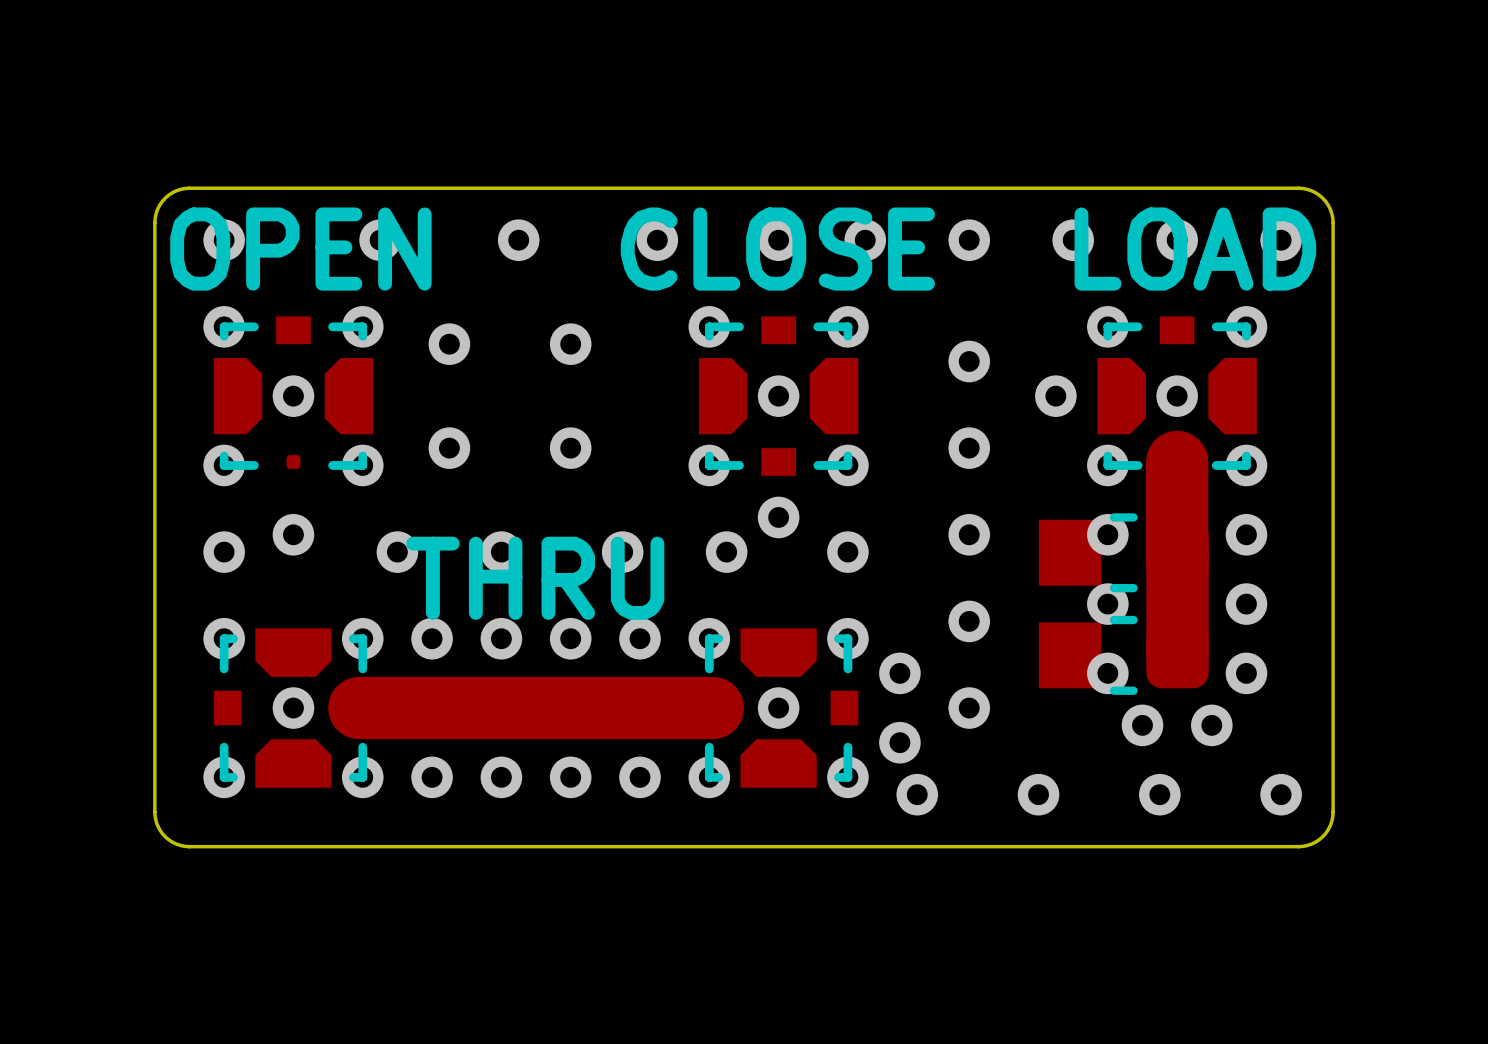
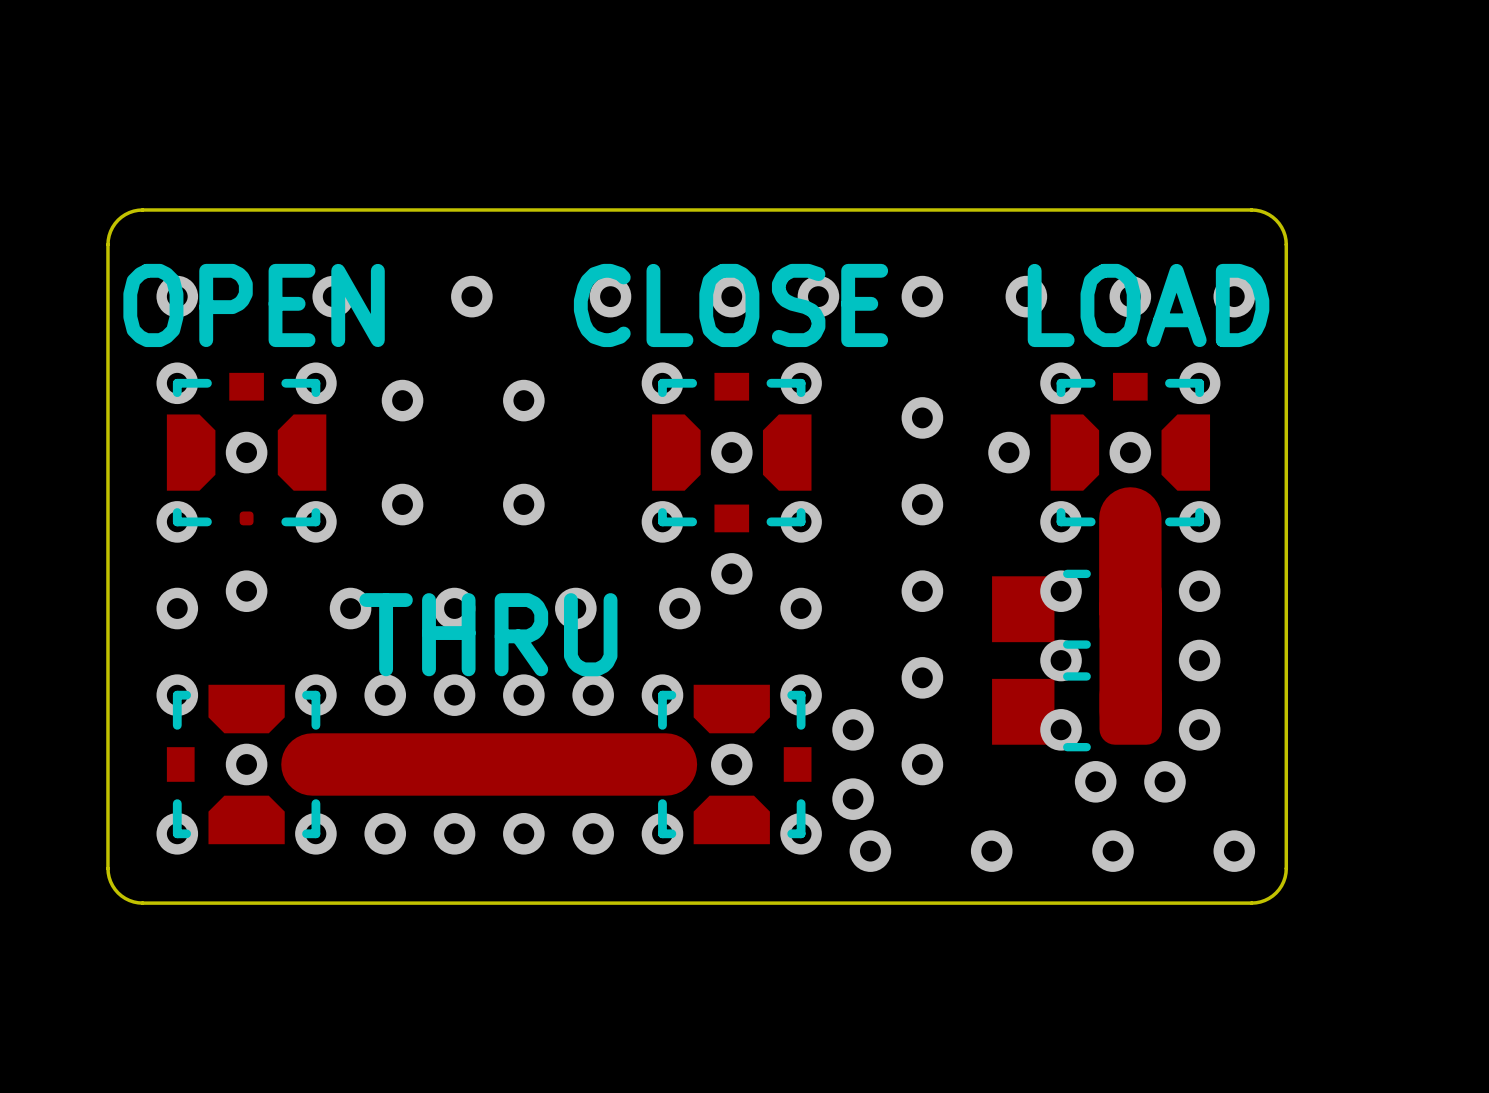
board edge: (154, 222) (157, 209) (164, 198) (176, 190) (189, 188) (1298, 188) (1311, 190) (1322, 198) (1330, 209) (1333, 222) -> (107, 279) (108, 240) (112, 227) (125, 214) (142, 209) (1251, 209) (1268, 214) (1281, 227) (1285, 240) (1286, 279)

